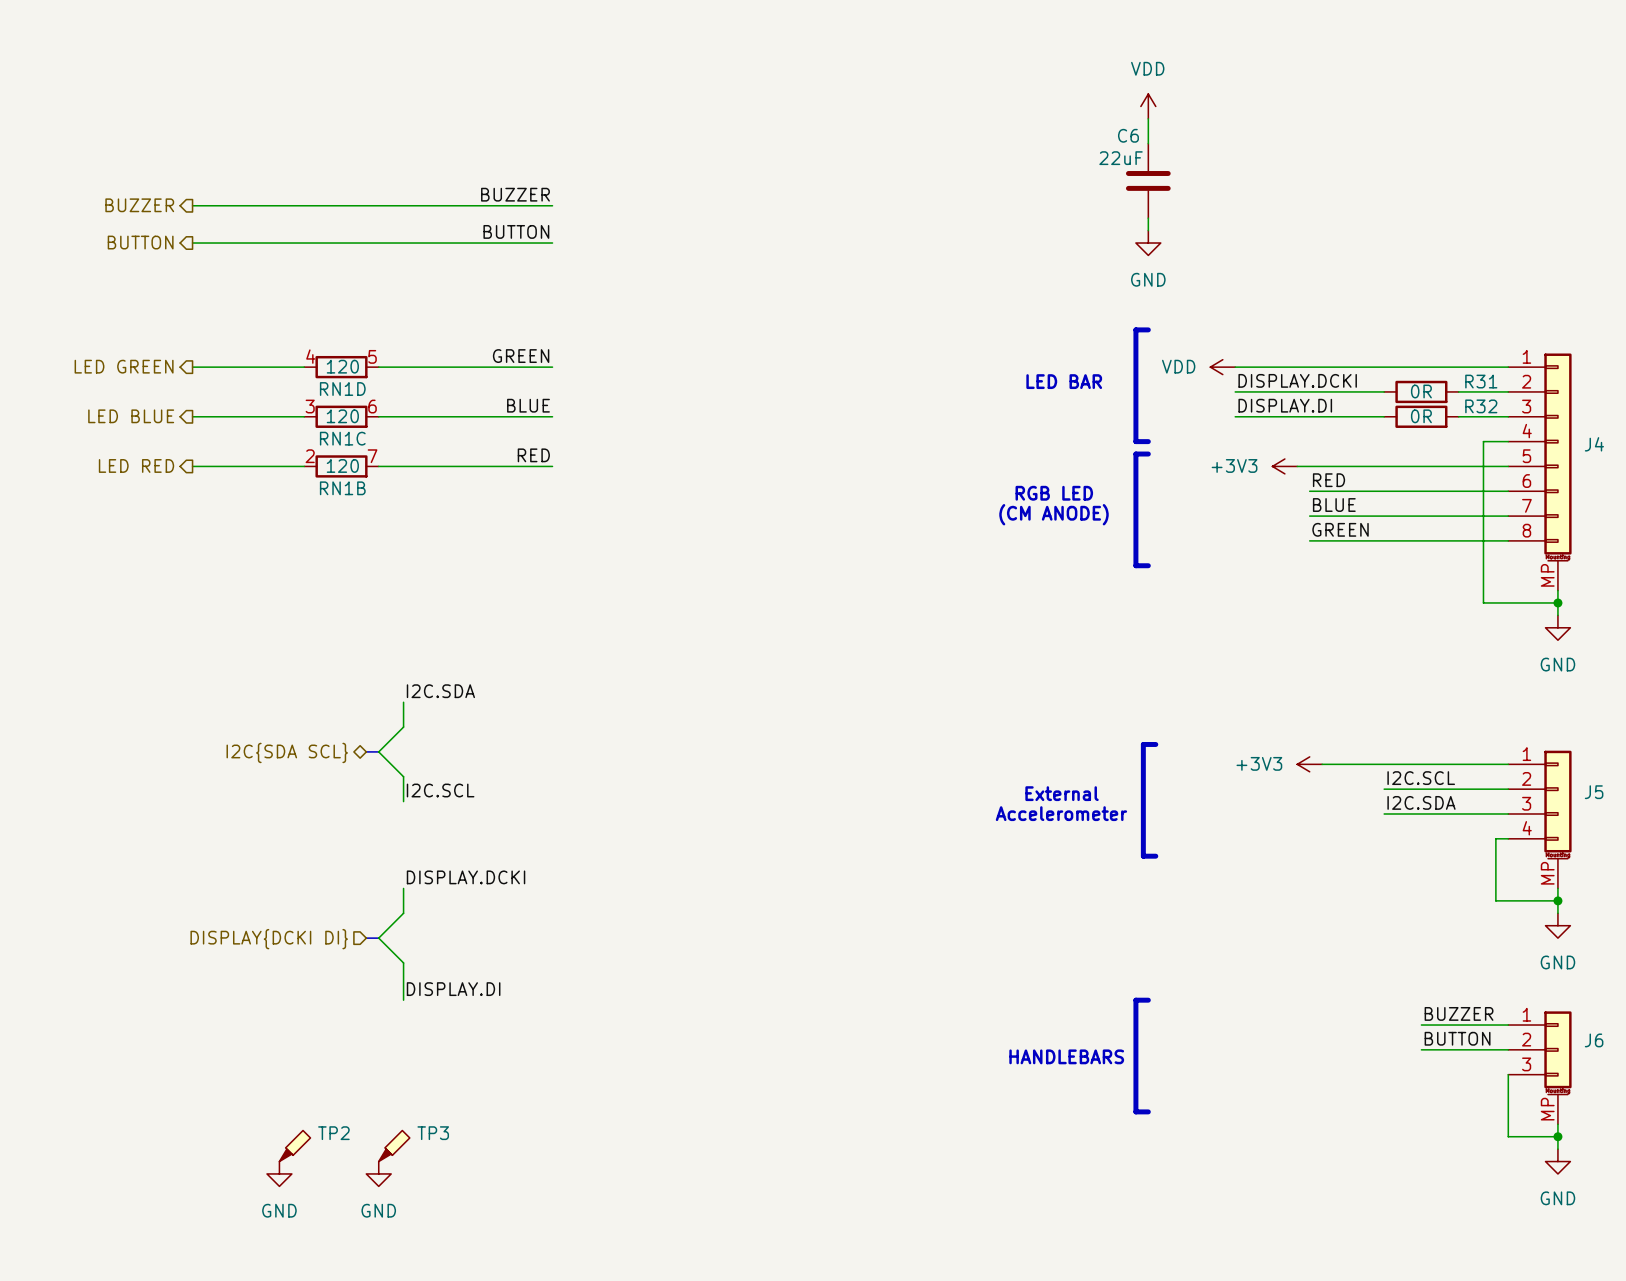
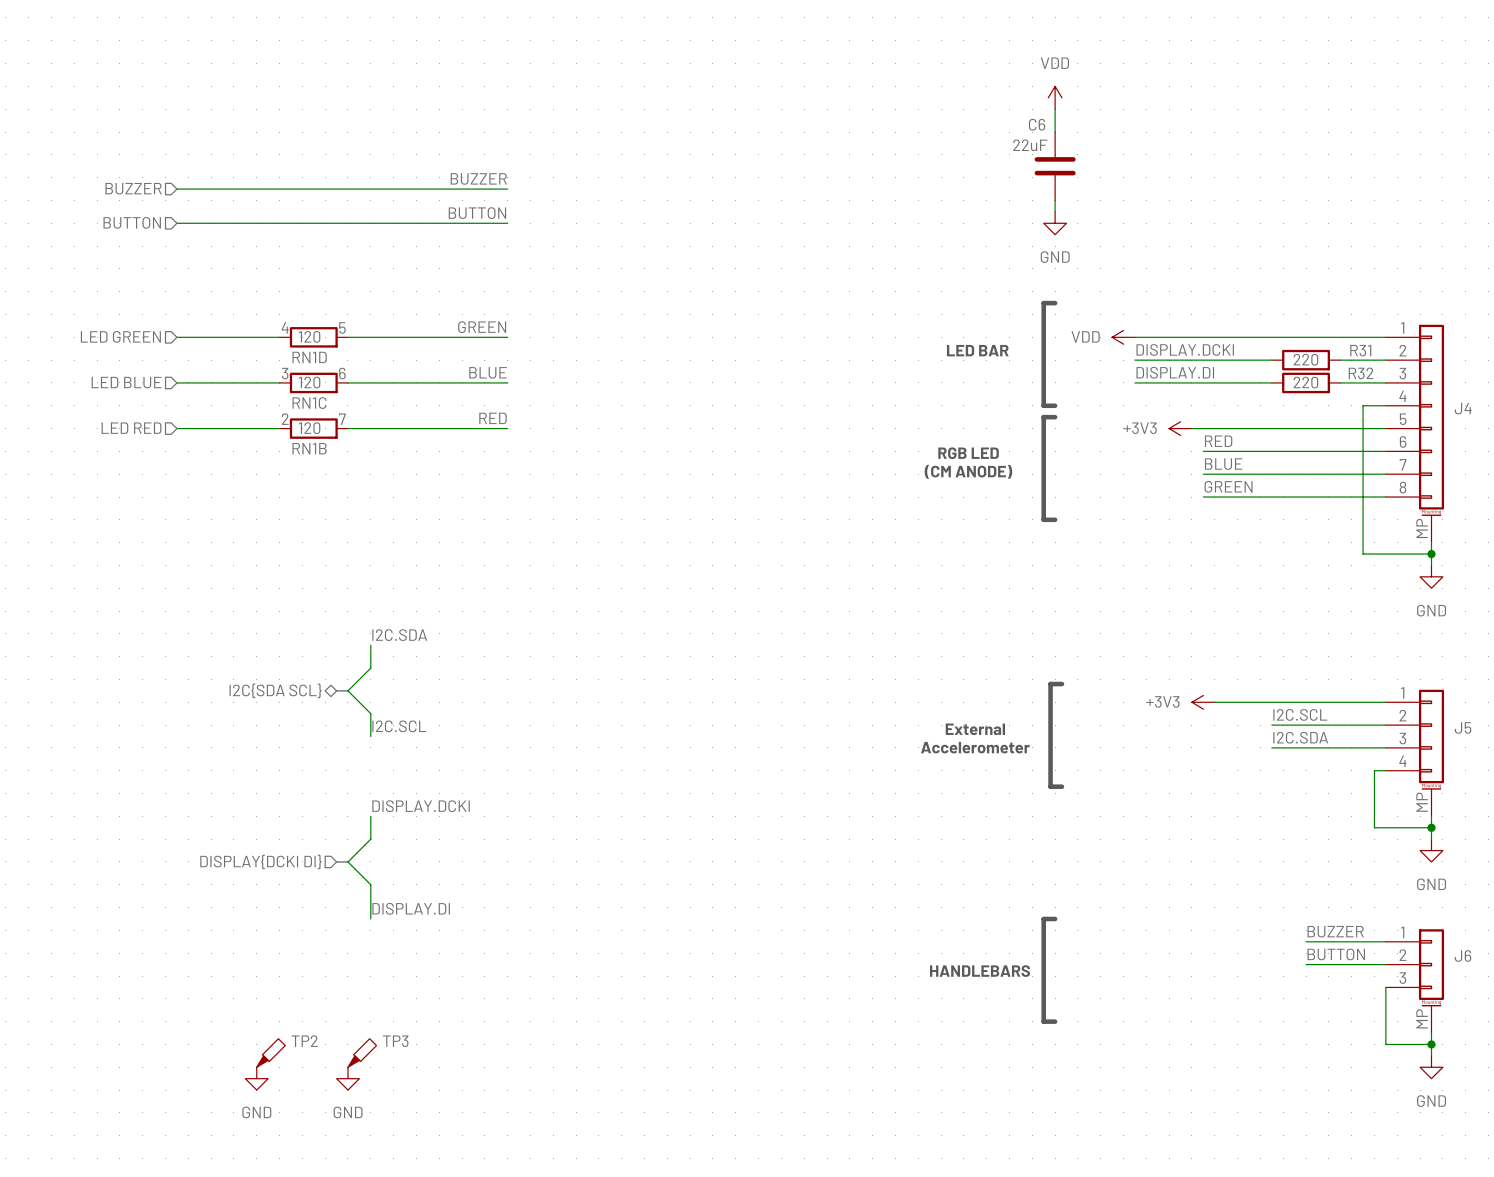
hierarchical label shape: output (139, 205) -> input (133, 188)
hierarchical label shape: output (140, 242) -> input (132, 222)
hierarchical label shape: output (124, 366) -> input (120, 336)
R31 value: 0R (1421, 391) -> 220 (1305, 359)
hierarchical label shape: output (131, 416) -> input (126, 382)
R32 value: 0R (1421, 416) -> 220 (1305, 382)
hierarchical label shape: output (136, 465) -> input (131, 428)

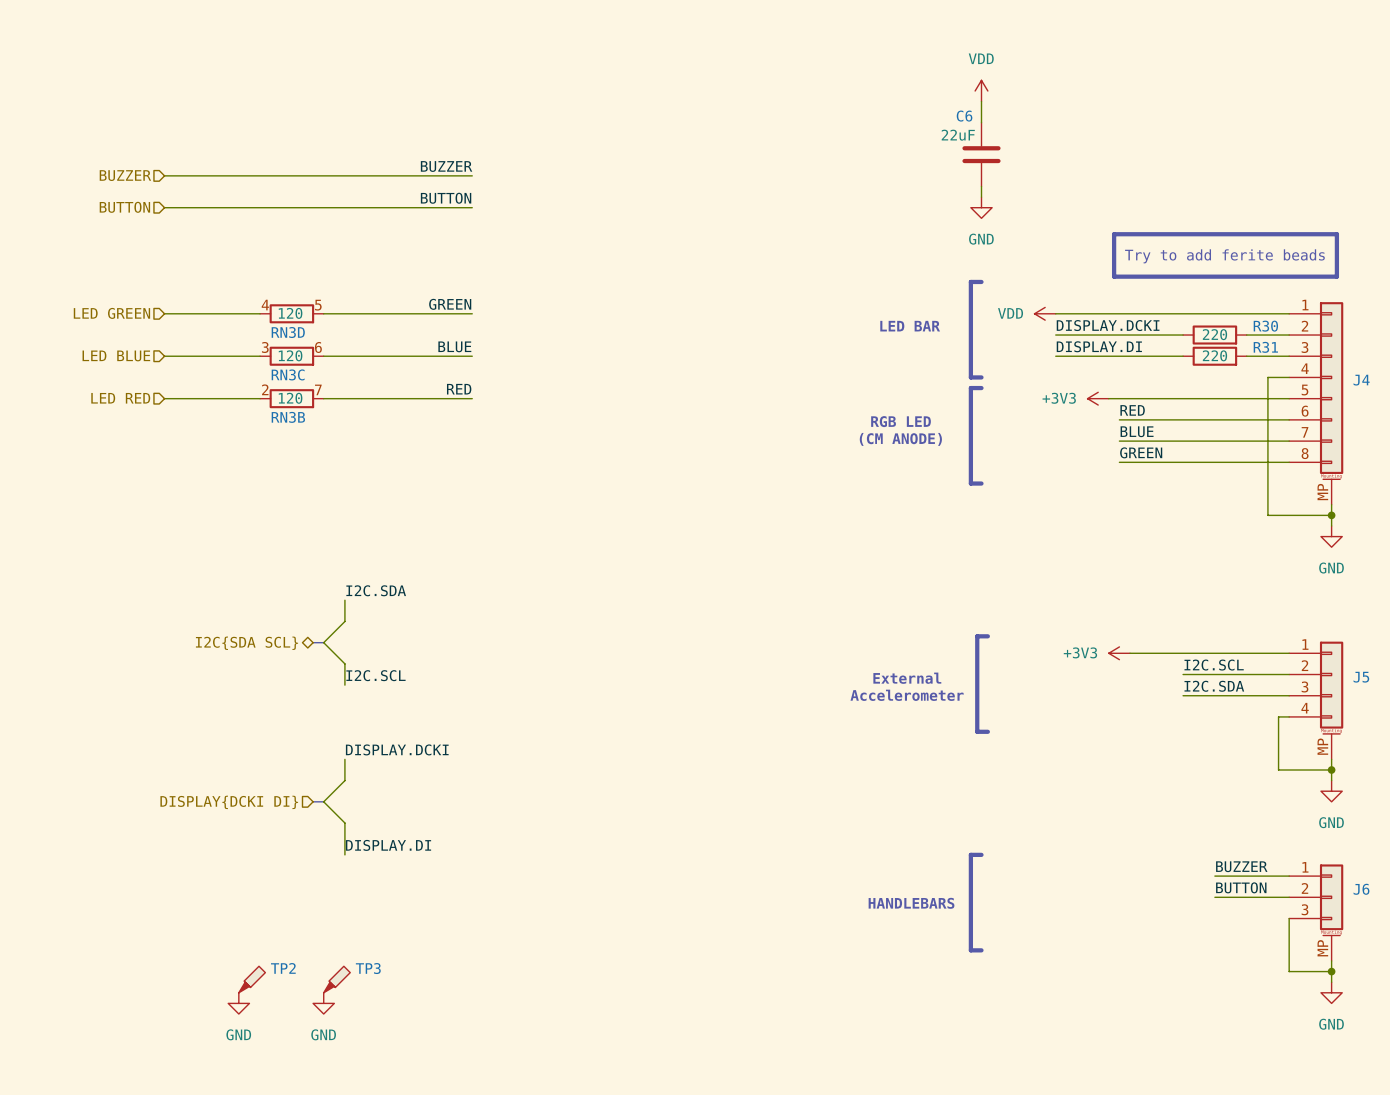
line: none -> (1114, 234) (1336, 234) (1336, 276) (1114, 276) (1114, 234)
text: none -> Try to add ferite beads (1224, 256)
R31 name: R31 (1360, 350) -> R30 (1265, 326)
RN1D name: RN1D (309, 357) -> RN3D (288, 332)
R32 name: R32 (1361, 373) -> R31 (1265, 347)
RN1C name: RN1C (309, 403) -> RN3C (288, 374)
RN1B name: RN1B (309, 448) -> RN3B (288, 417)

